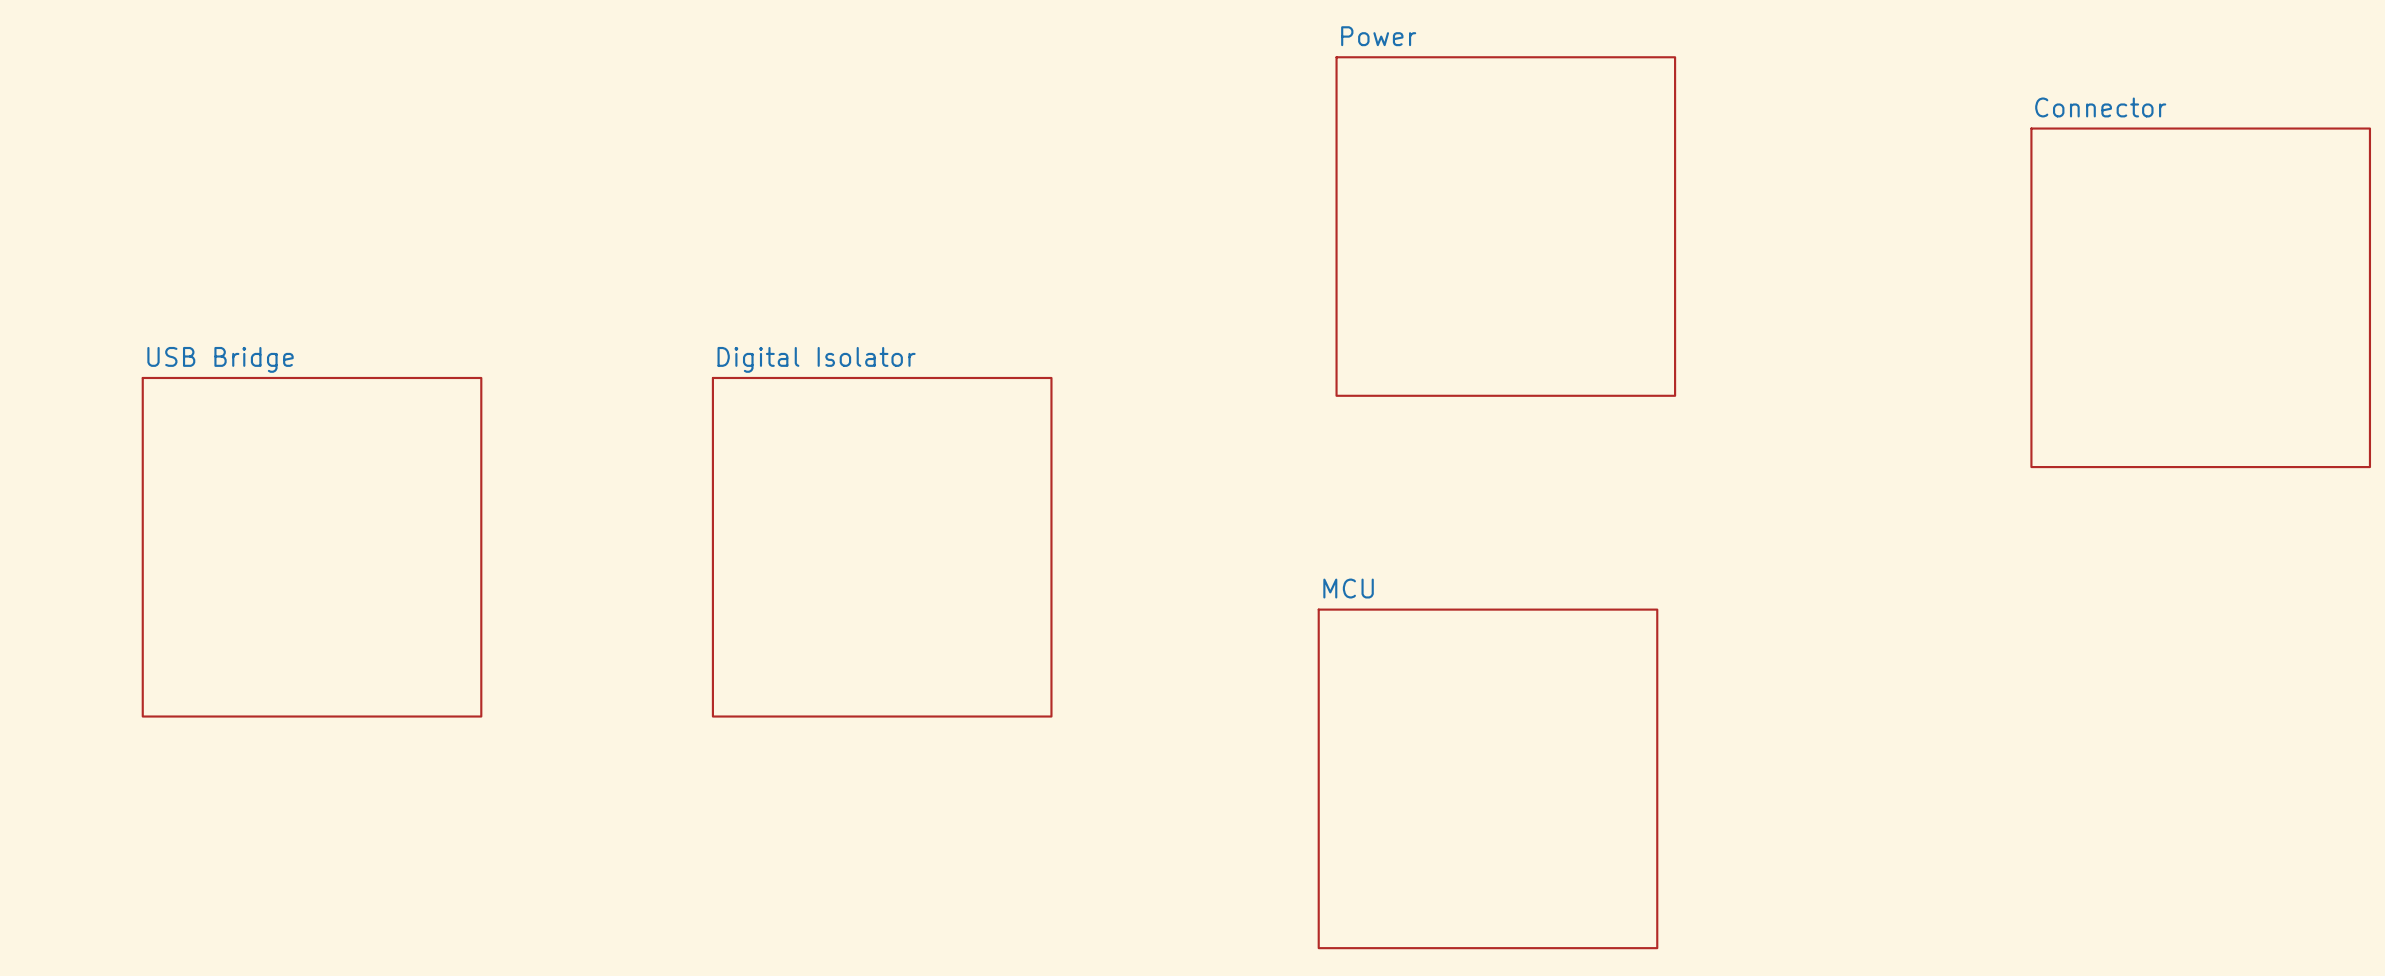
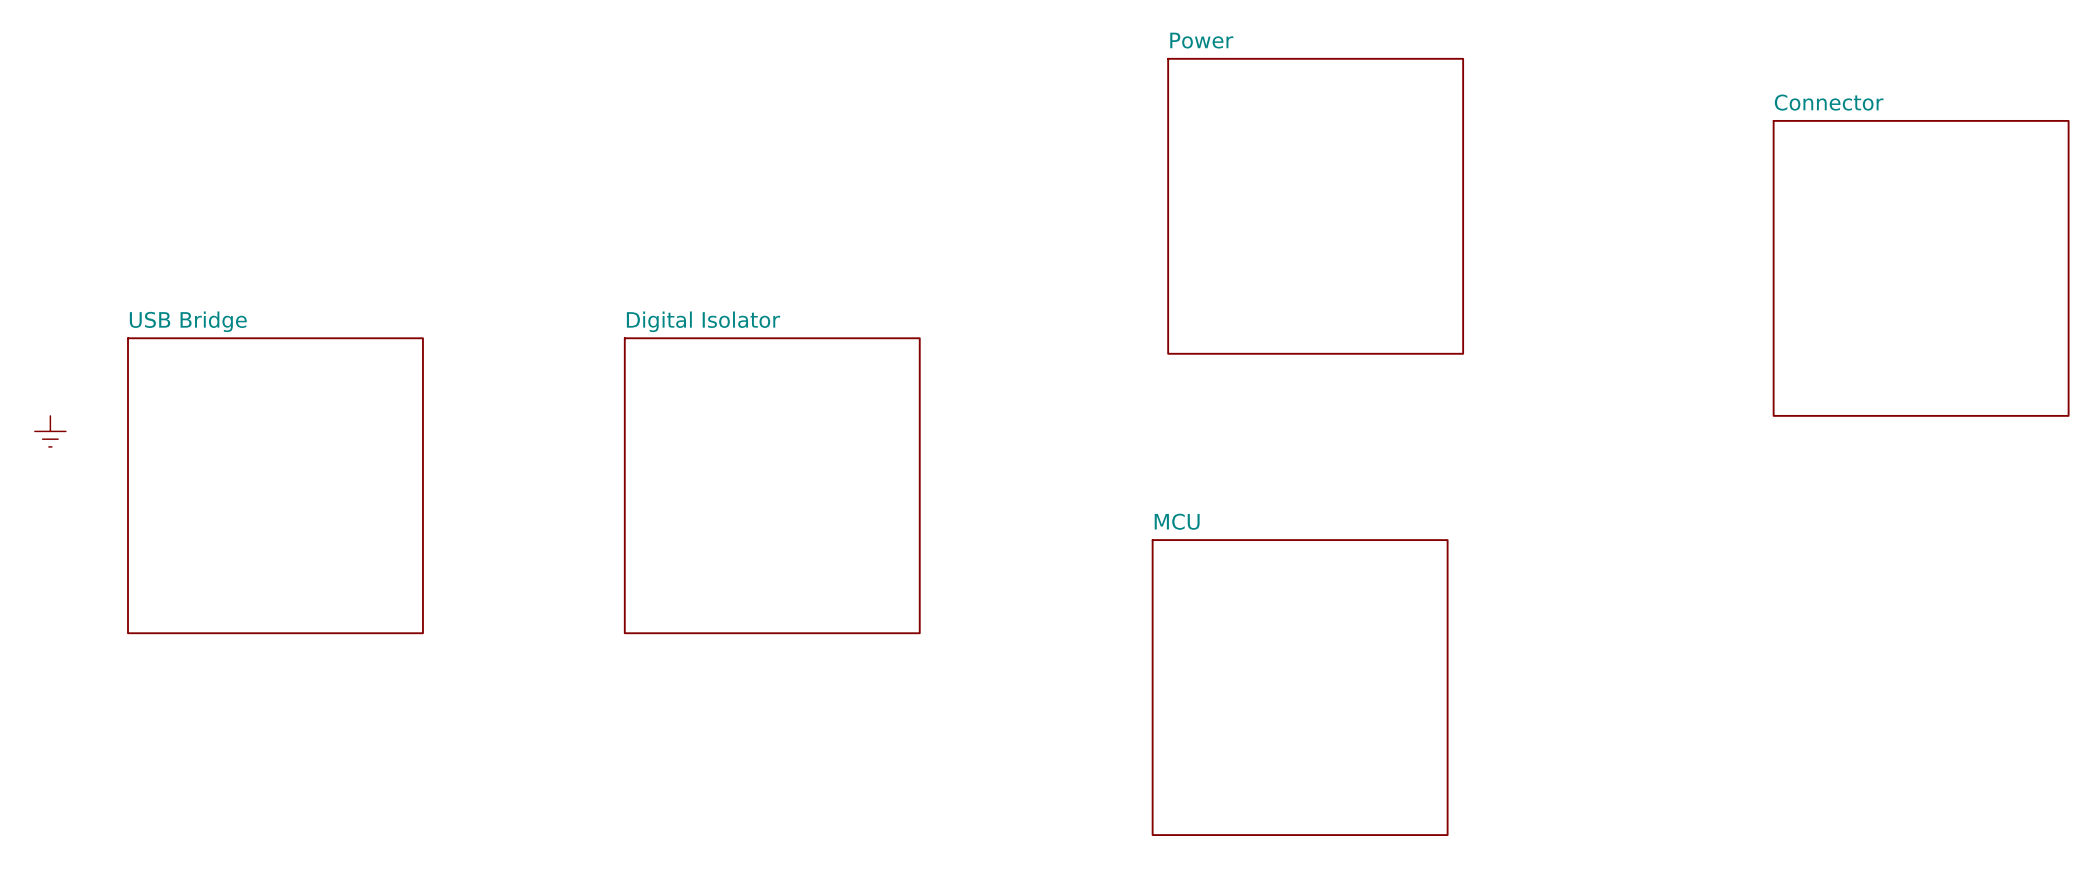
power symbol: none -> (50, 431)

